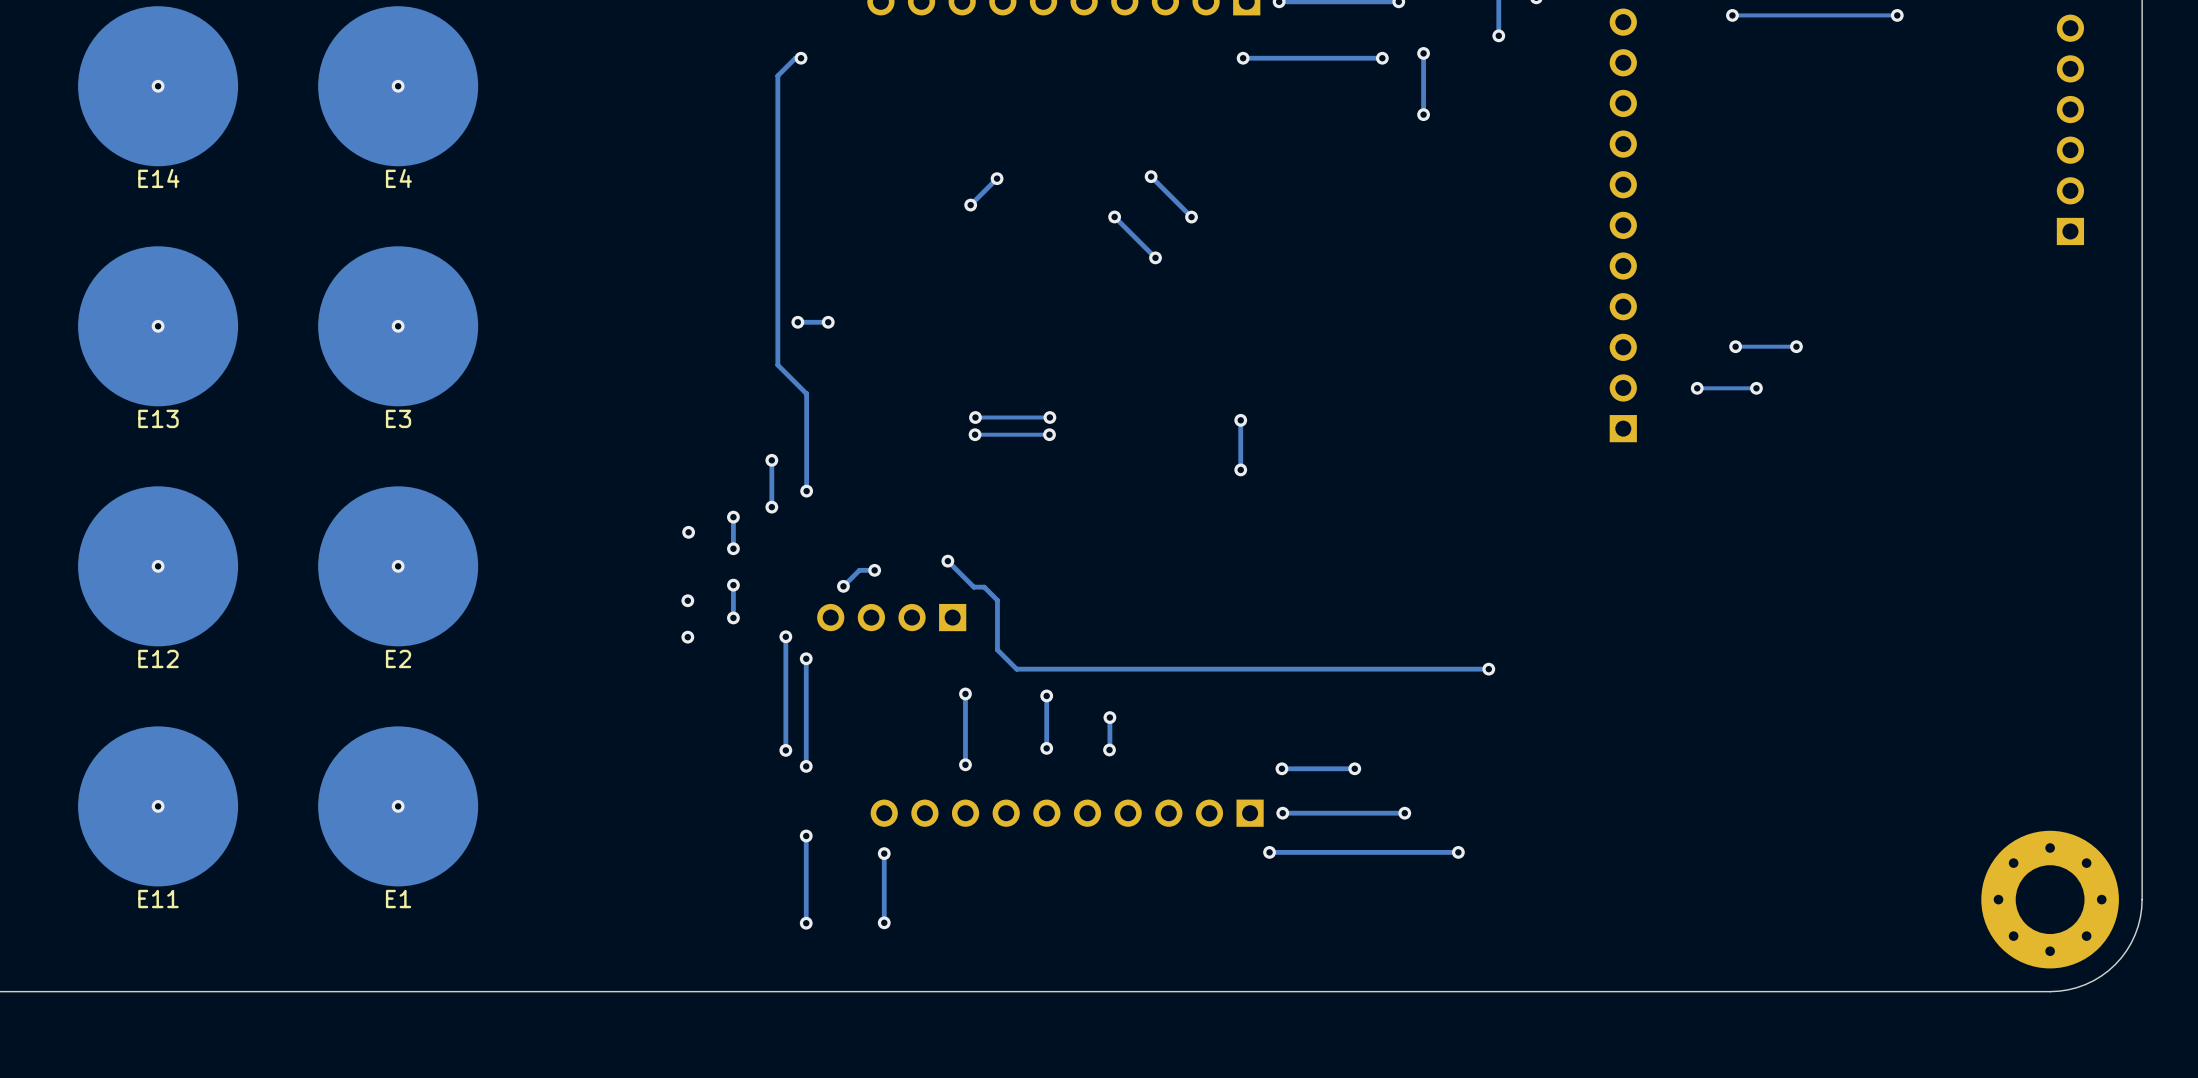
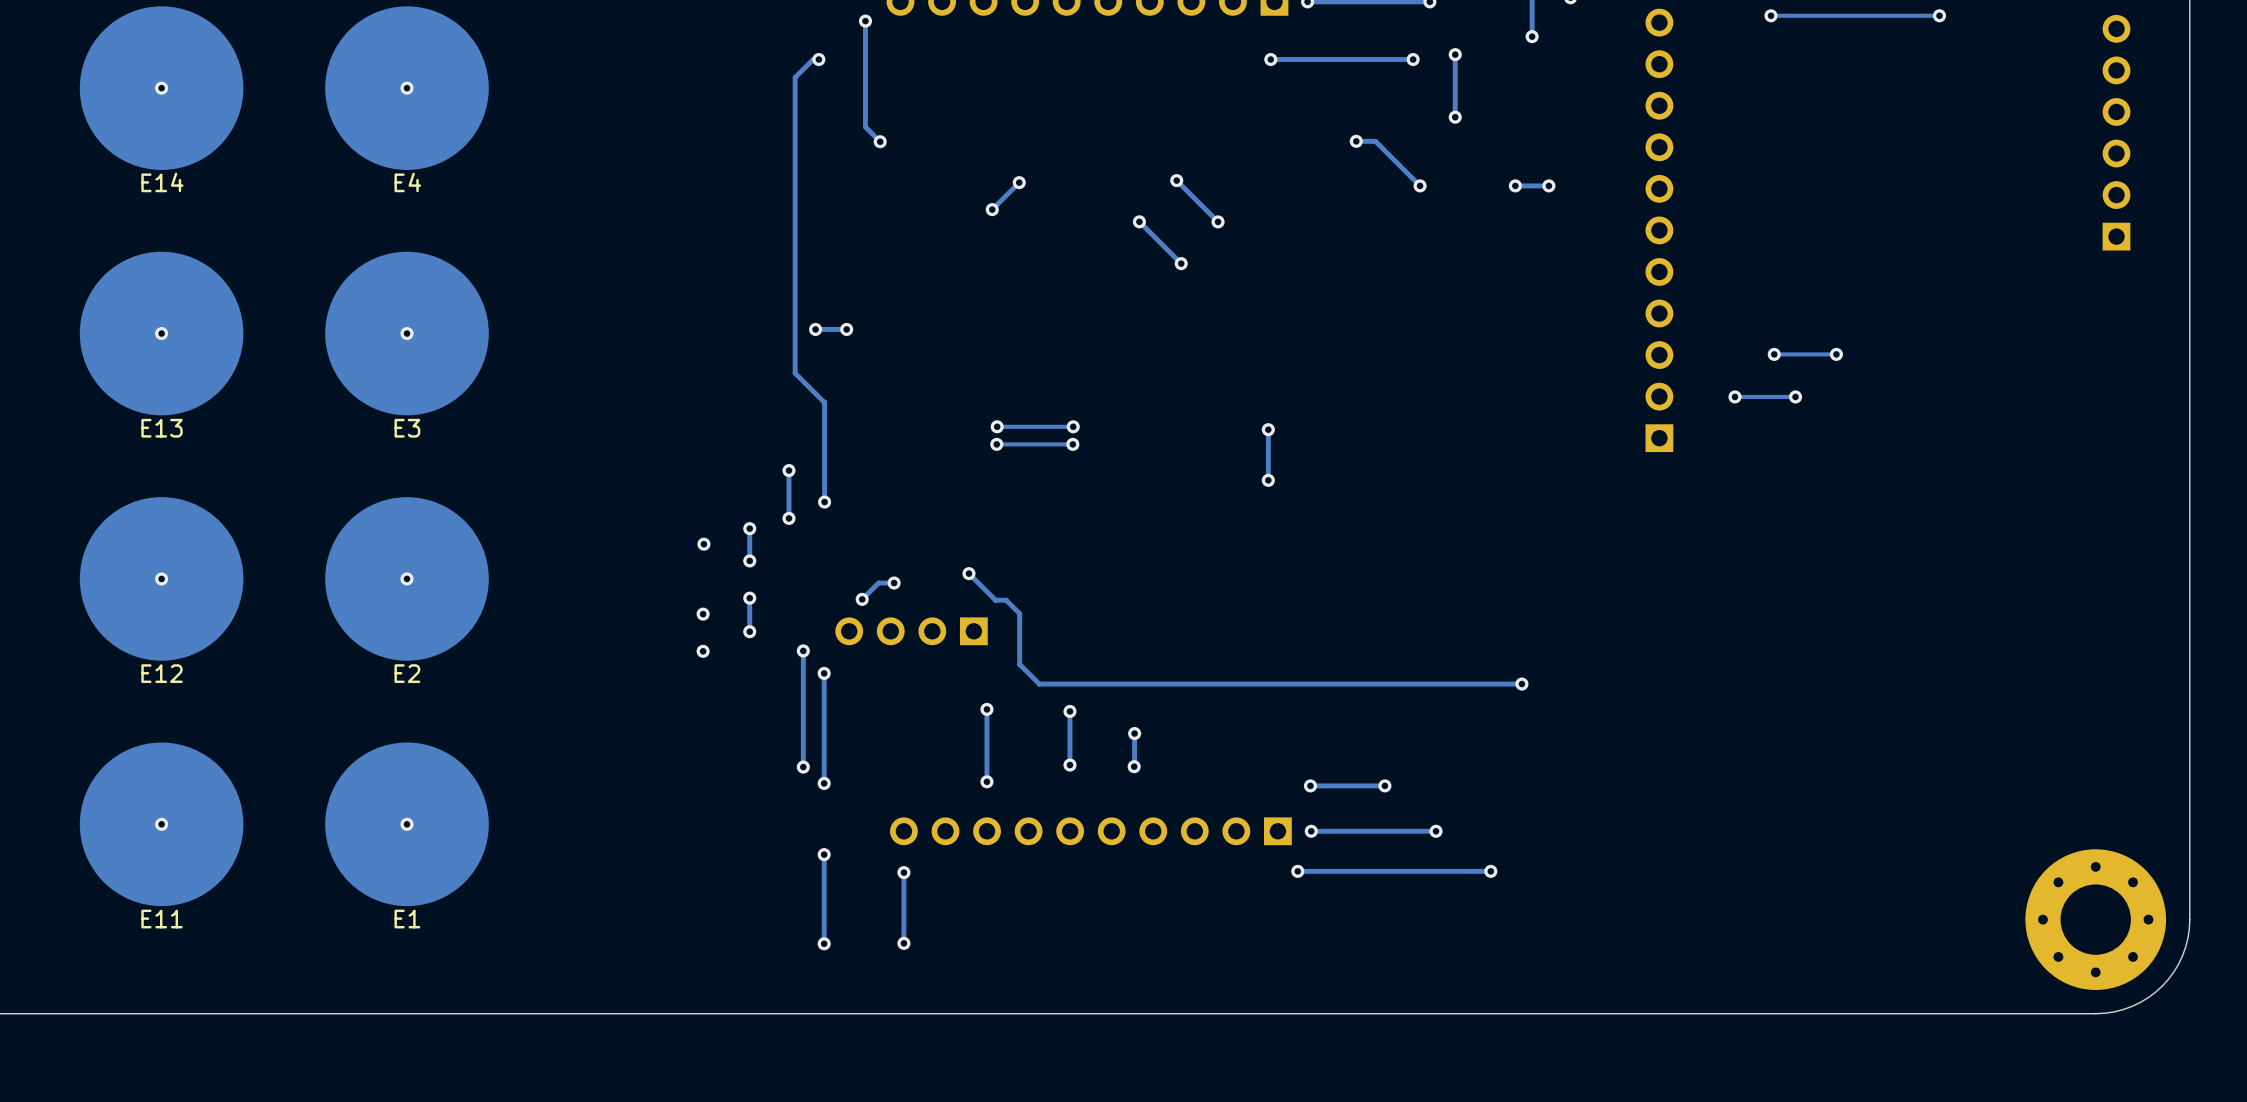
track: none -> (865, 21) (865, 127) (880, 141)
via: none -> (865, 21)
via: none -> (880, 141)
track: none -> (1356, 141) (1375, 141) (1420, 185)
via: none -> (1356, 141)
via: none -> (1420, 185)
via: none -> (1515, 185)
track: none -> (1548, 185) (1515, 185)
via: none -> (1548, 185)

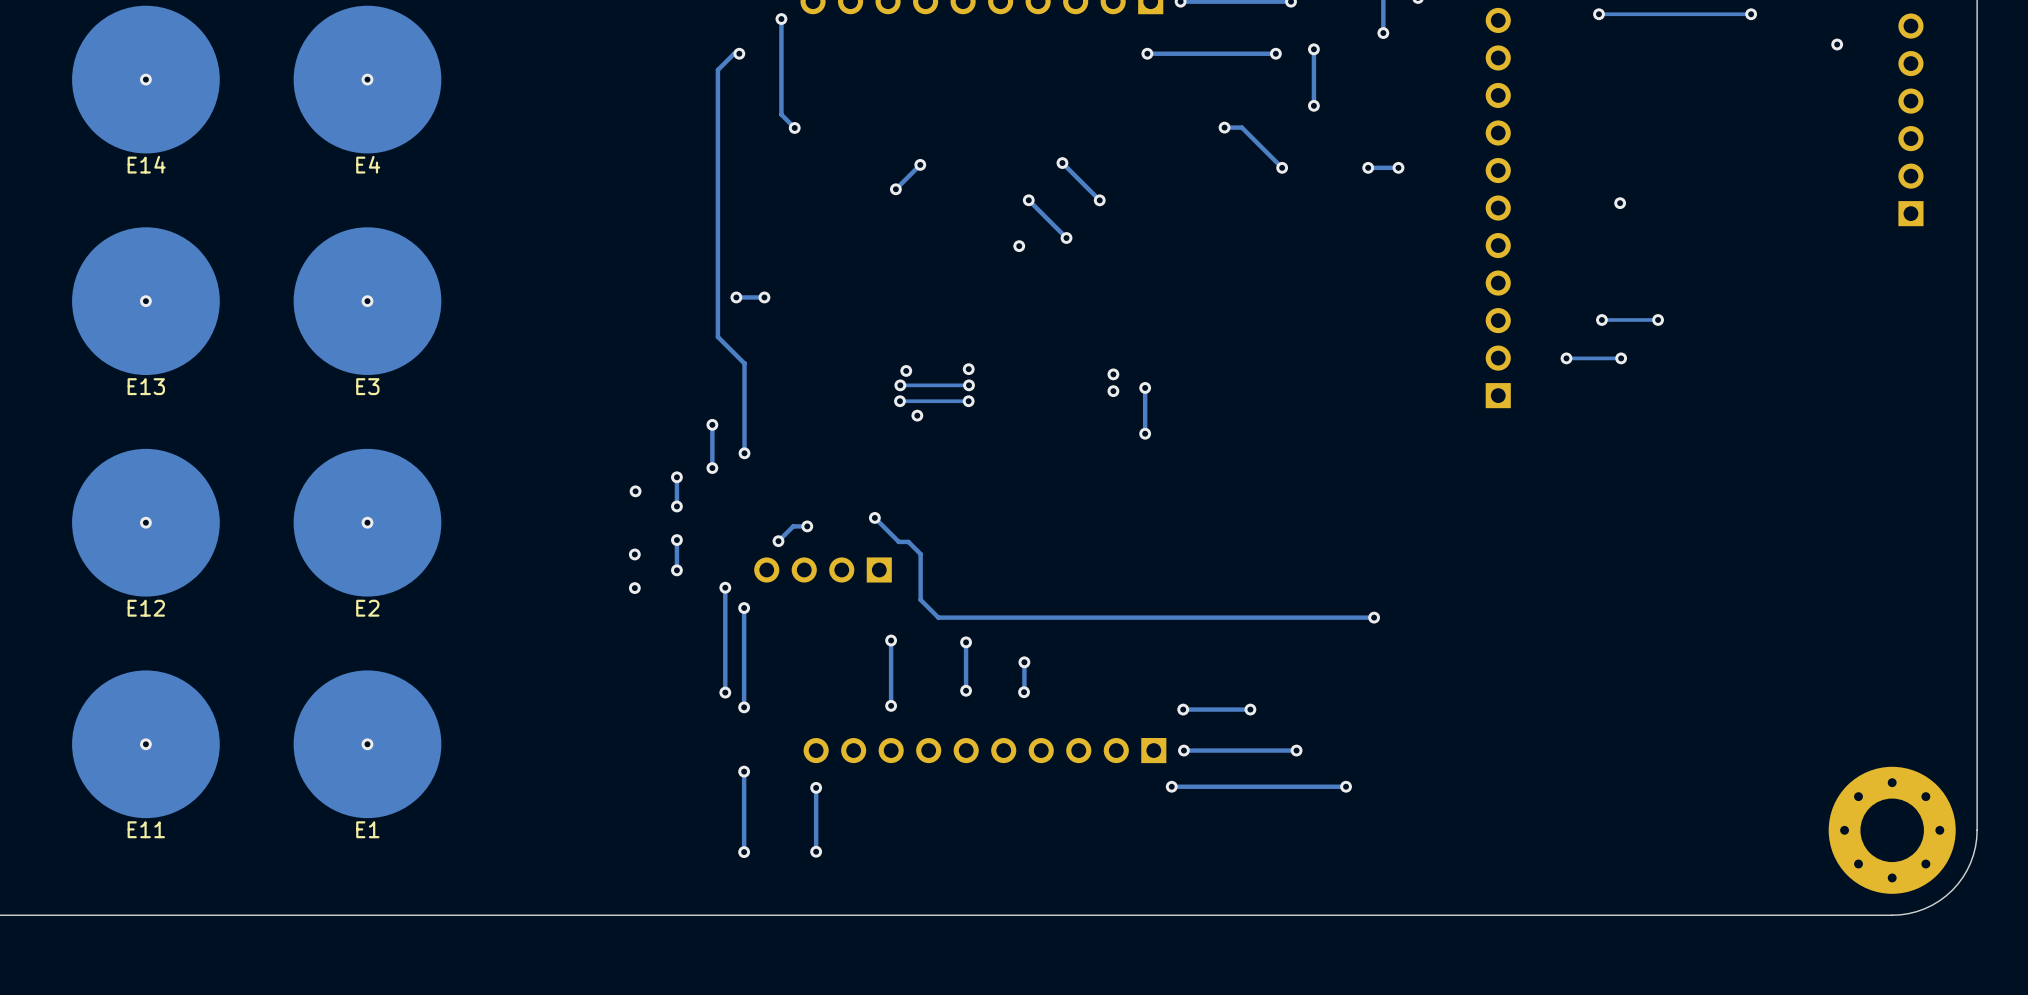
via: none -> (1837, 44)
via: none -> (1620, 203)
via: none -> (1019, 246)
via: none -> (968, 369)
via: none -> (906, 370)
via: none -> (1113, 374)
via: none -> (1113, 391)
via: none -> (917, 415)

